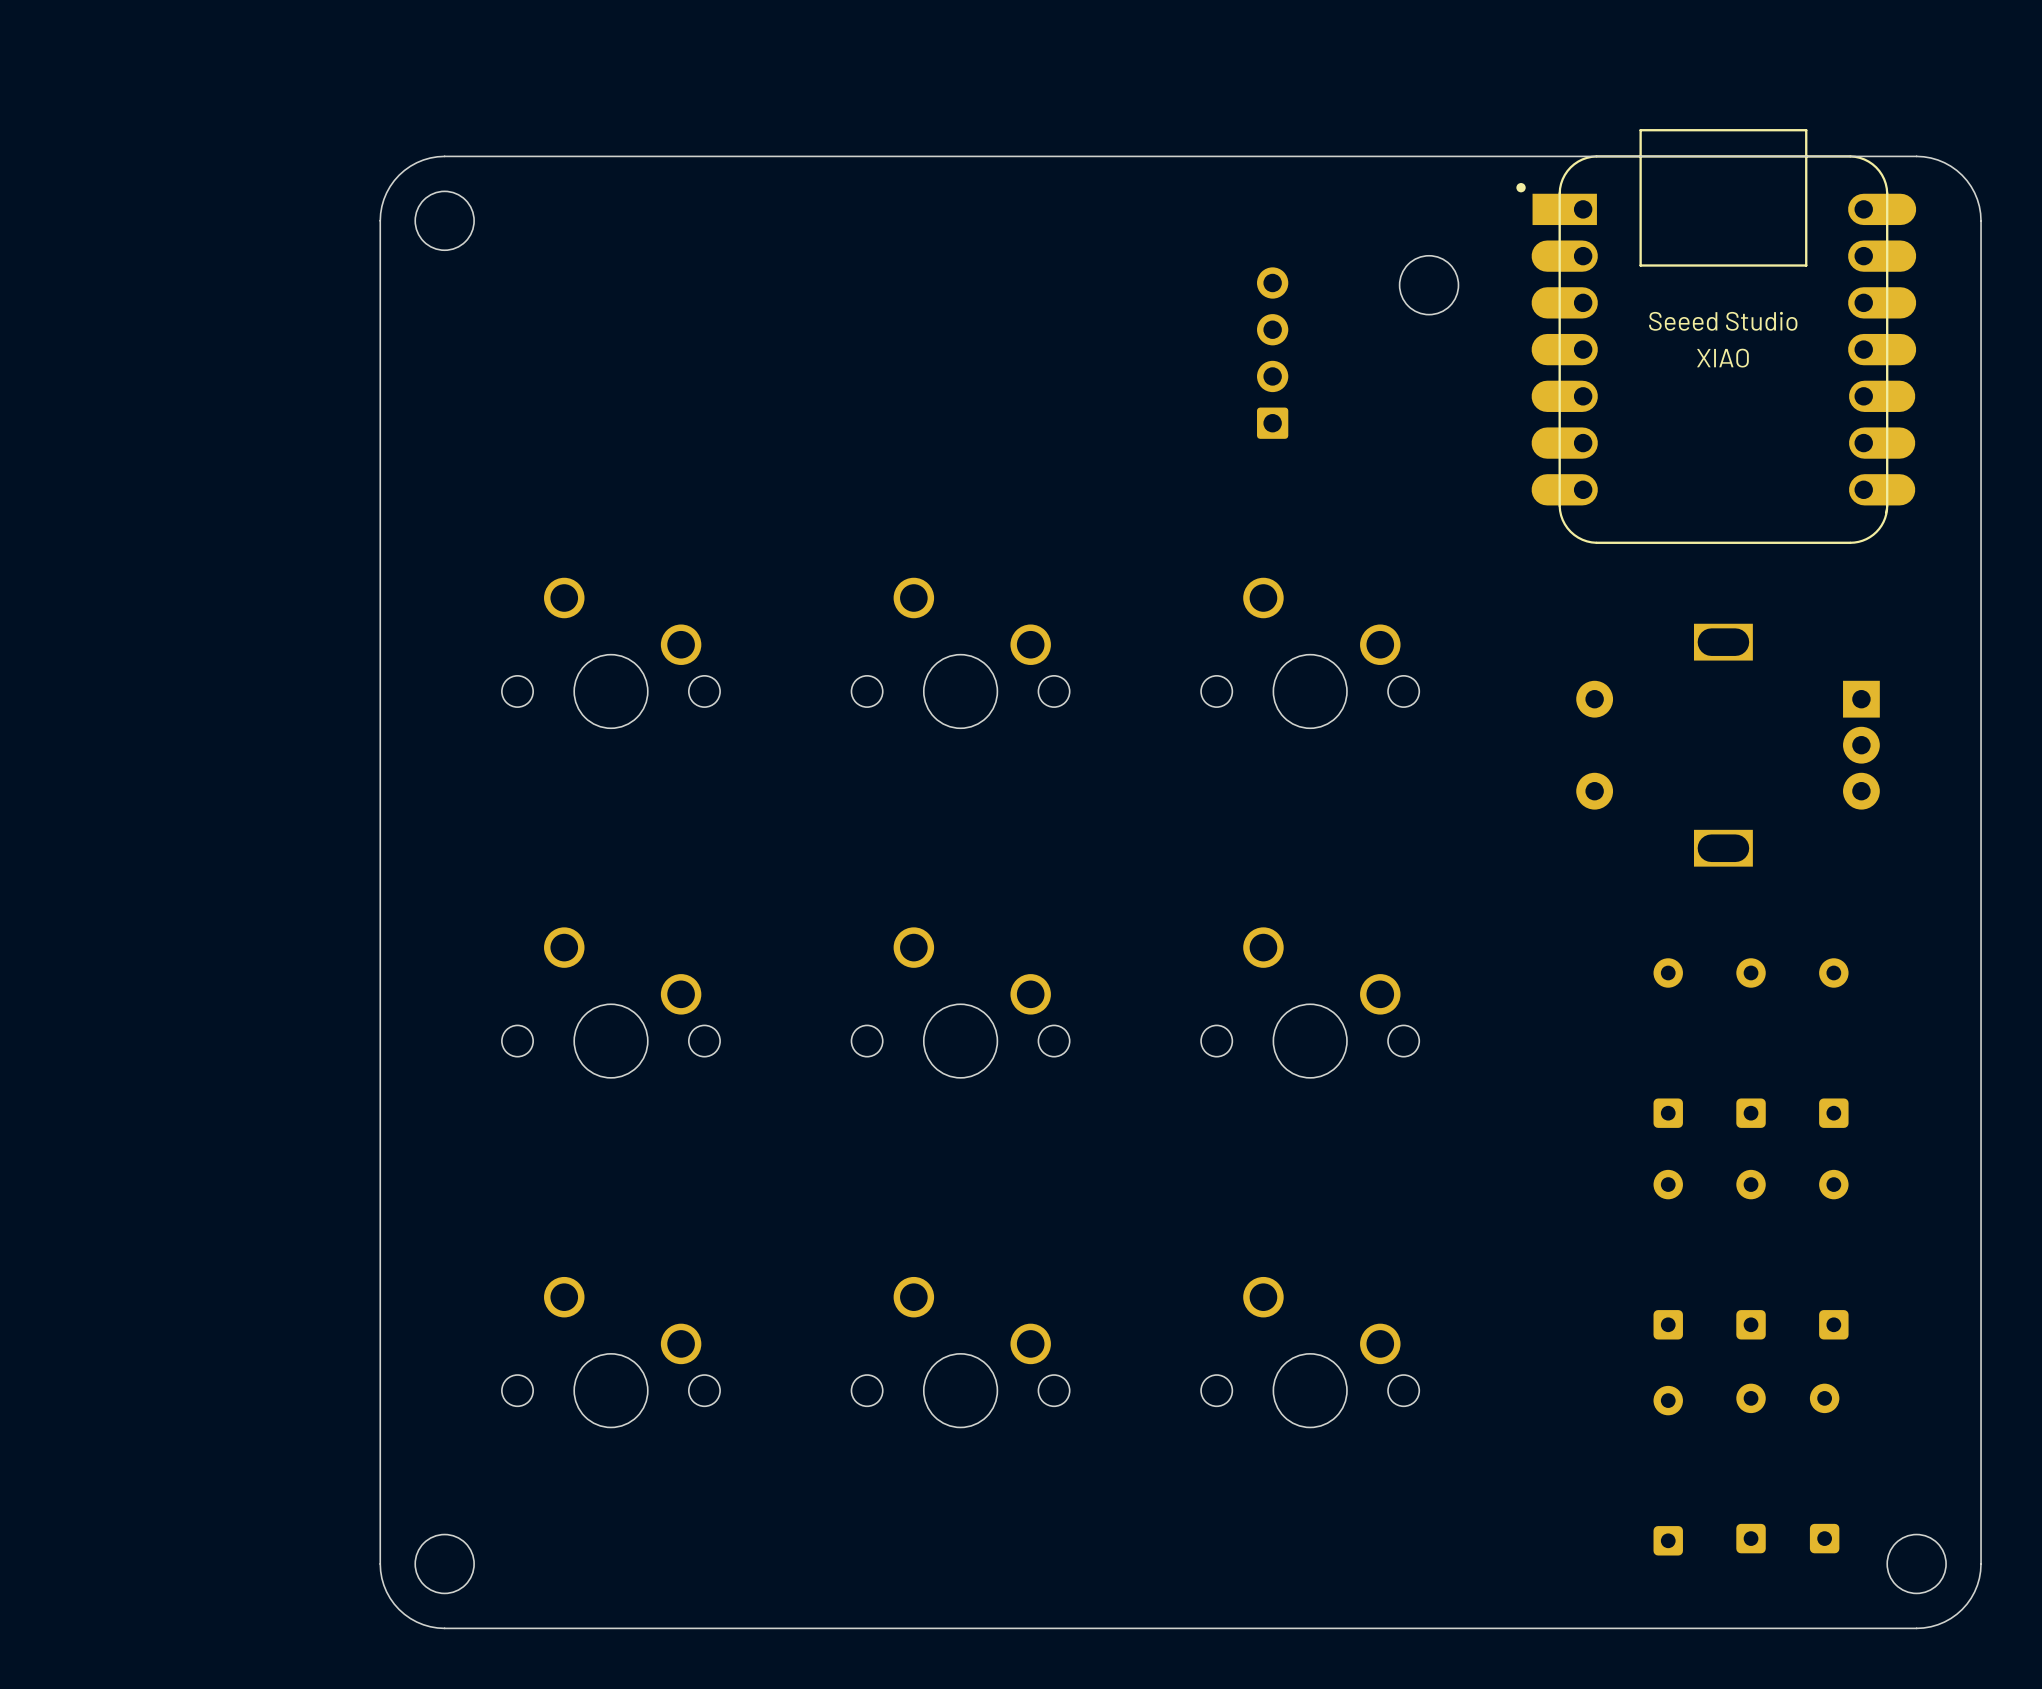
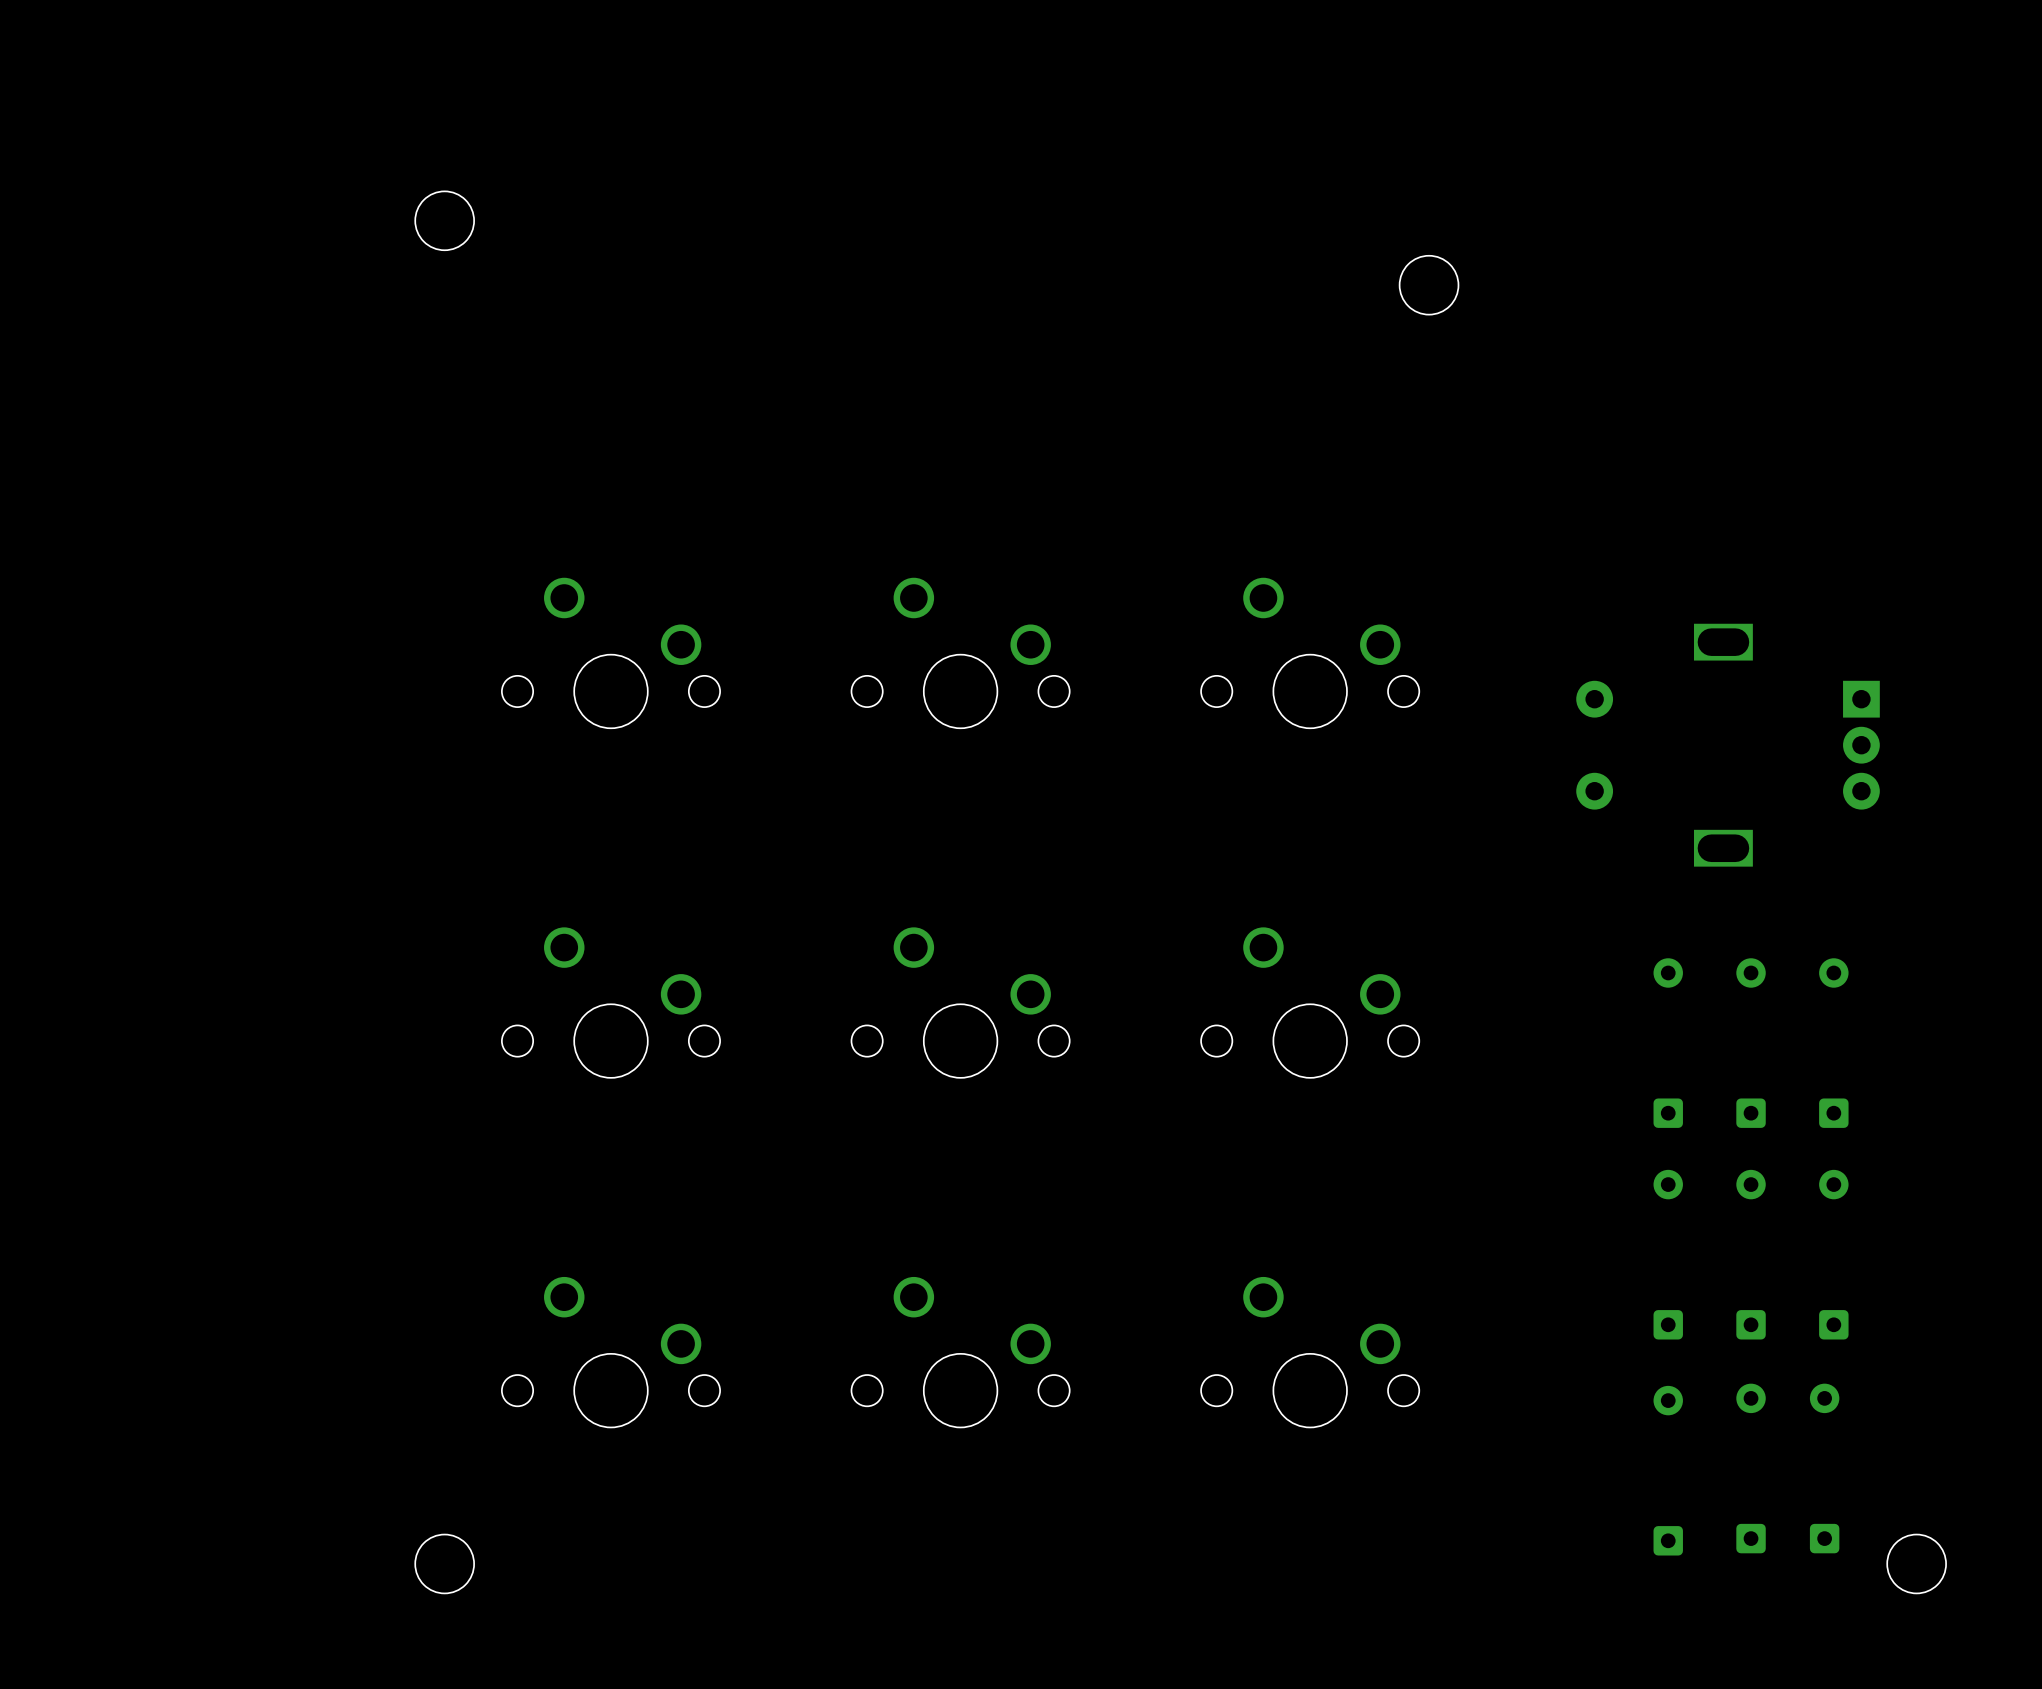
board edge: (1916, 156) (444, 156) (430, 158) (416, 162) (399, 175) (386, 192) (381, 206) (380, 220) (380, 1563) (383, 1585) (390, 1598) (399, 1609) (416, 1622) (430, 1626) (444, 1628) (1916, 1628) (1930, 1626) (1944, 1622) (1962, 1609) (1971, 1598) (1977, 1585) (1981, 1563) (1981, 220) (1977, 199) (1971, 186) (1962, 175) (1950, 166) (1937, 160) (1916, 156) -> none
part: (1716, 336) -> none
part: (1272, 353) -> none

